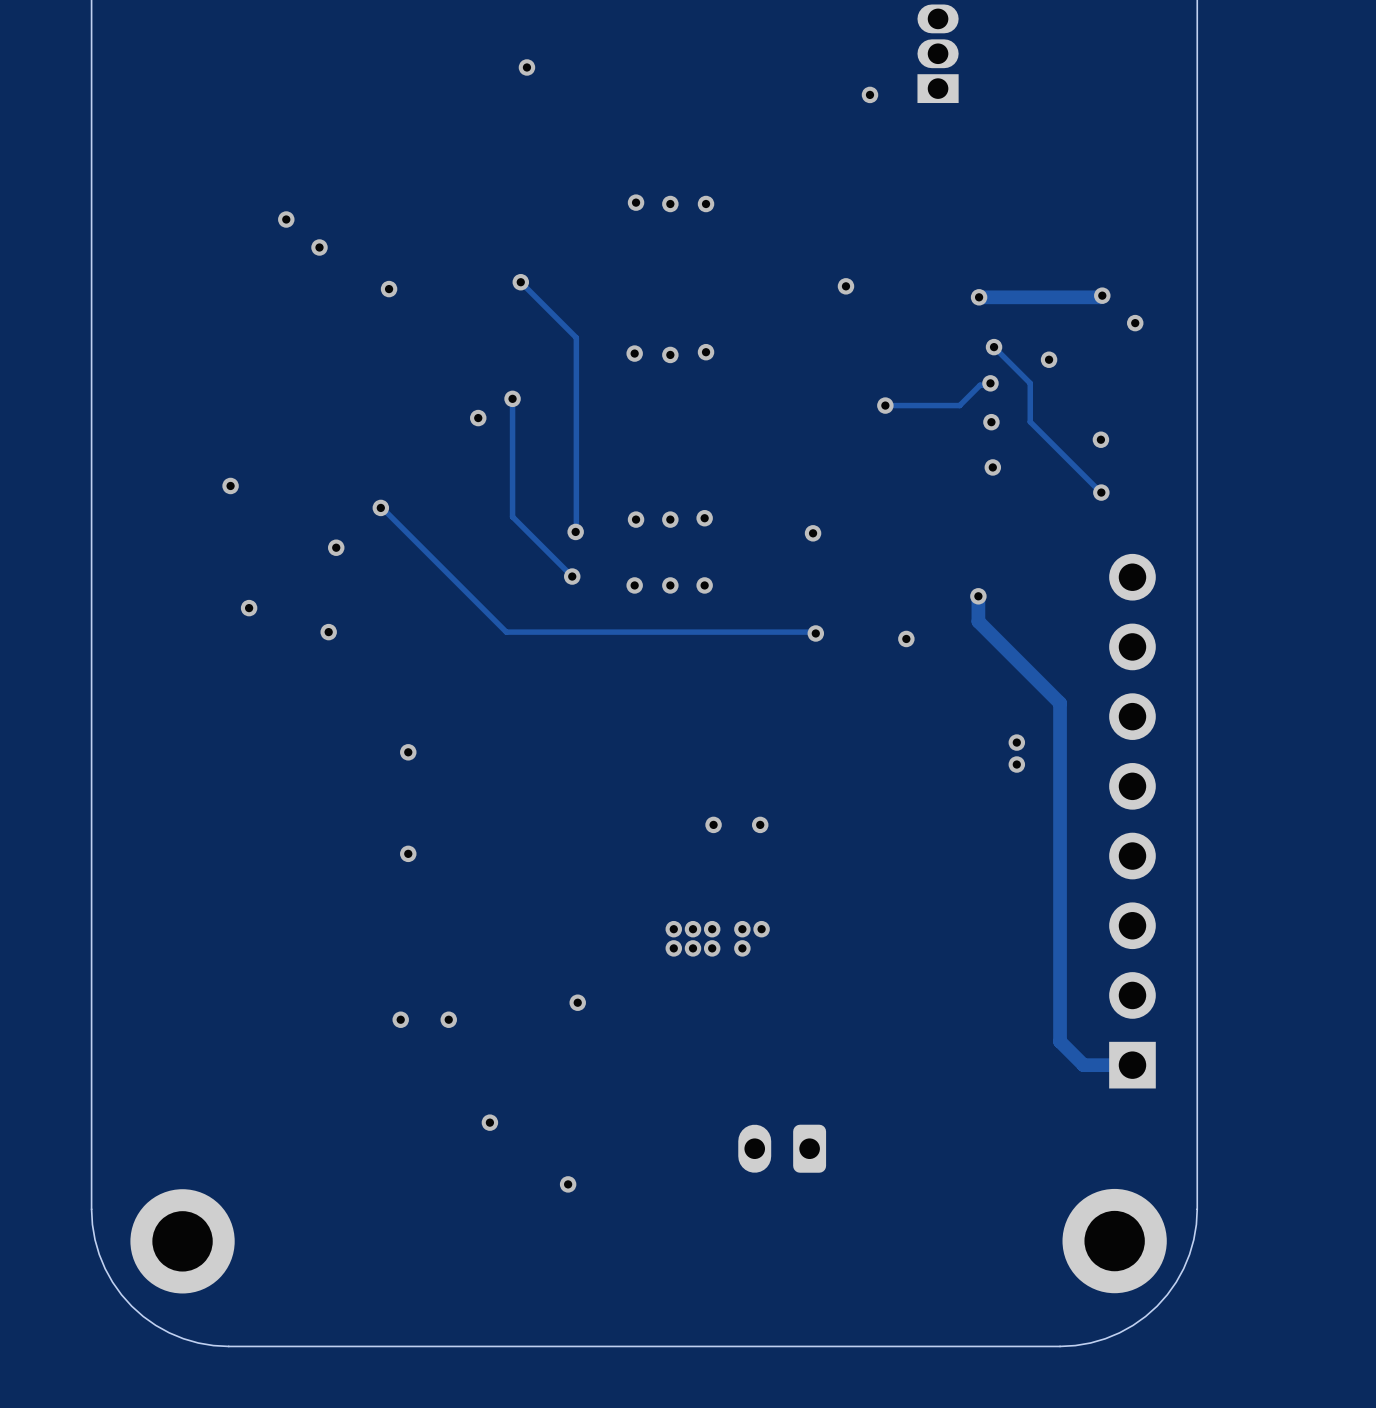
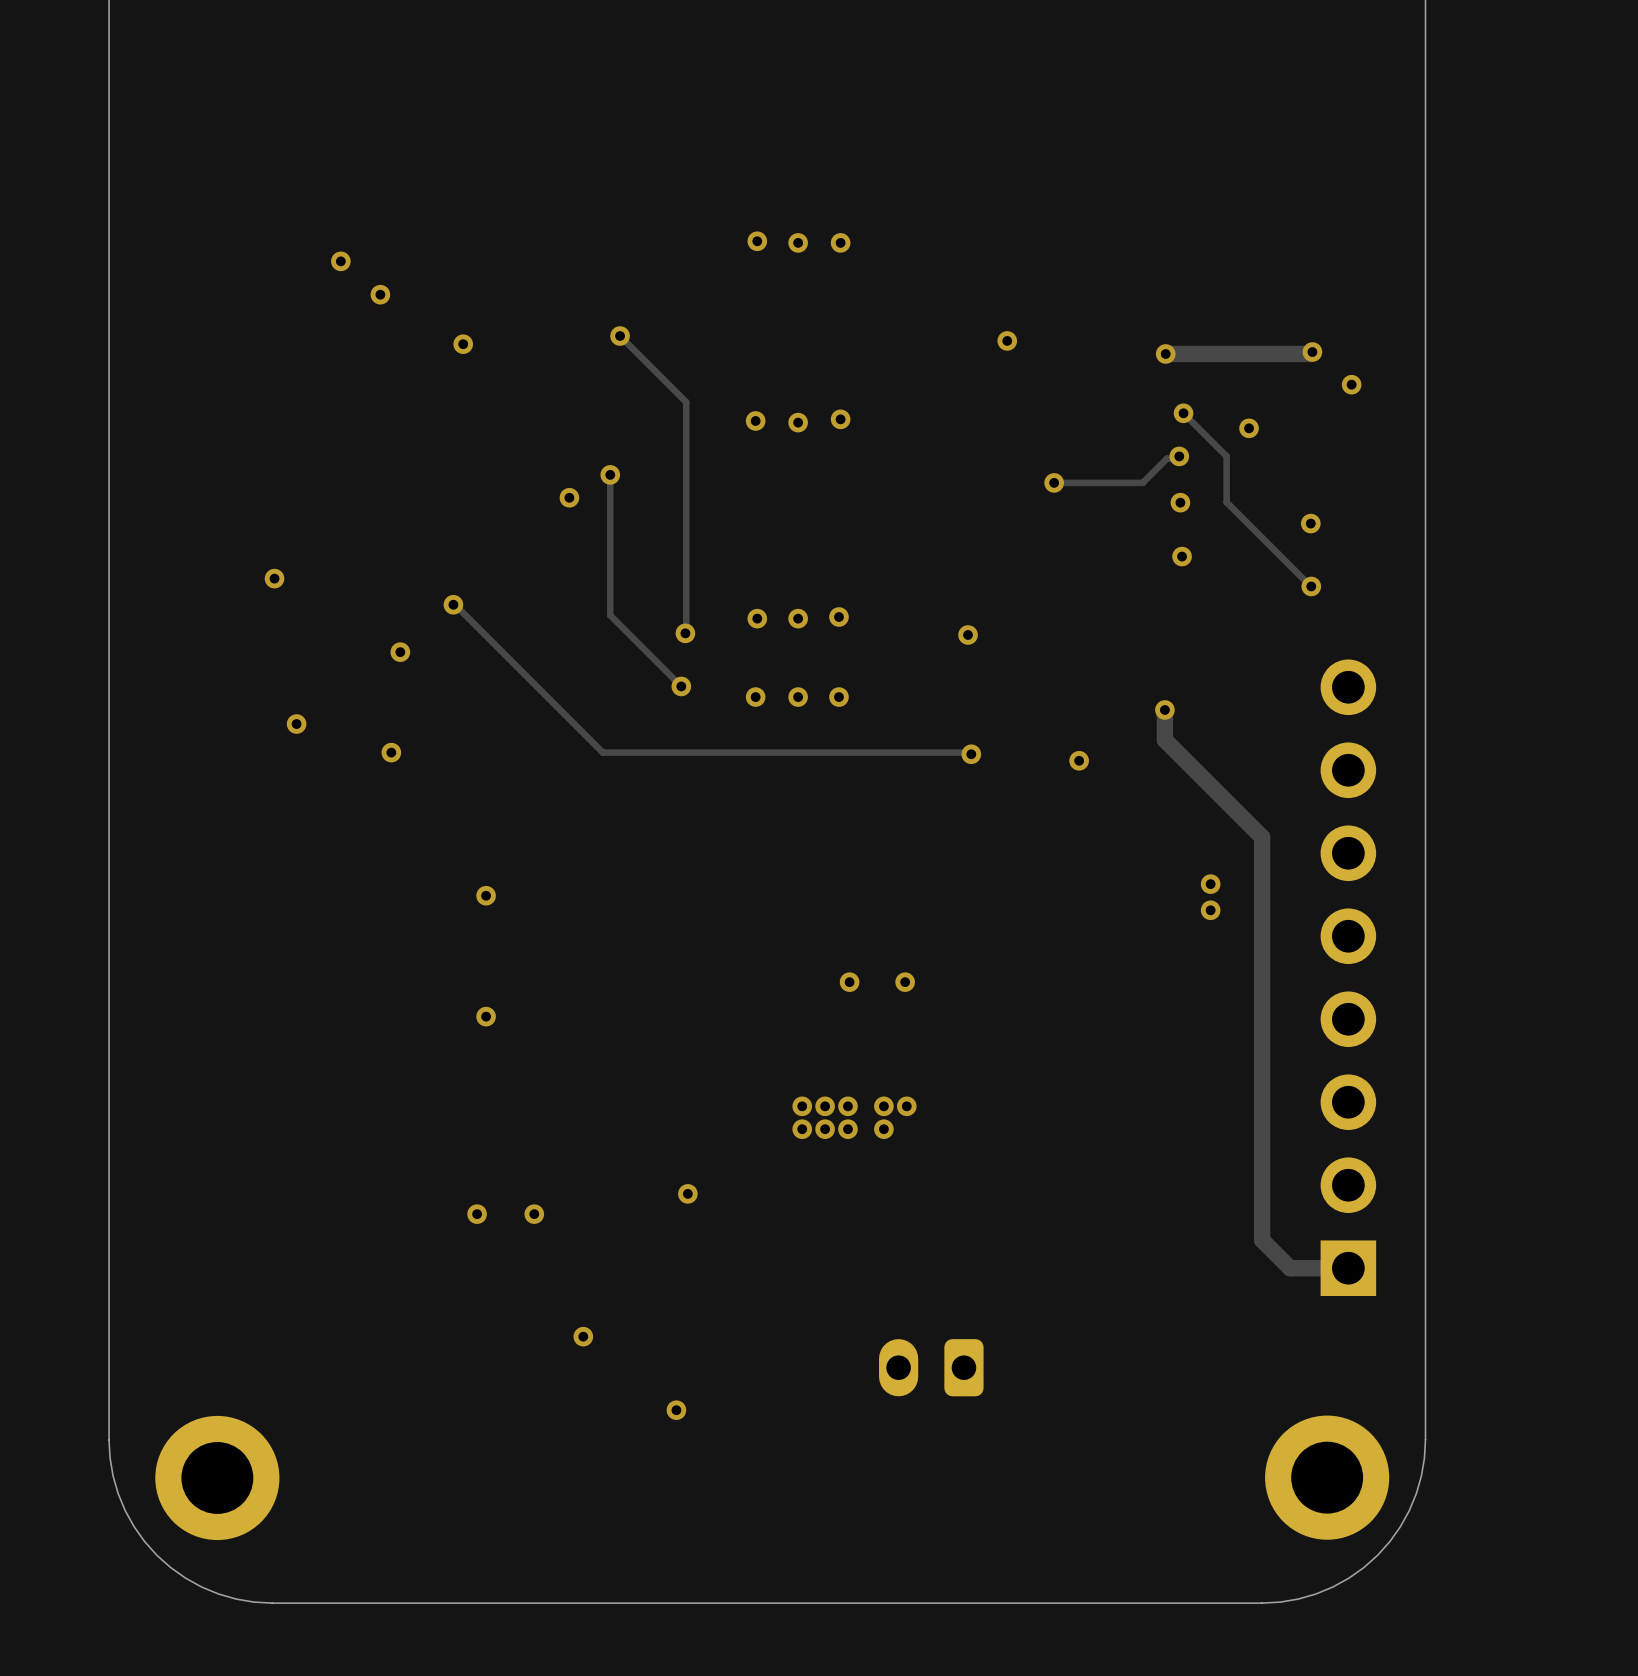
part: (938, 53) -> none
via: (526, 67) -> none
via: (869, 94) -> none

